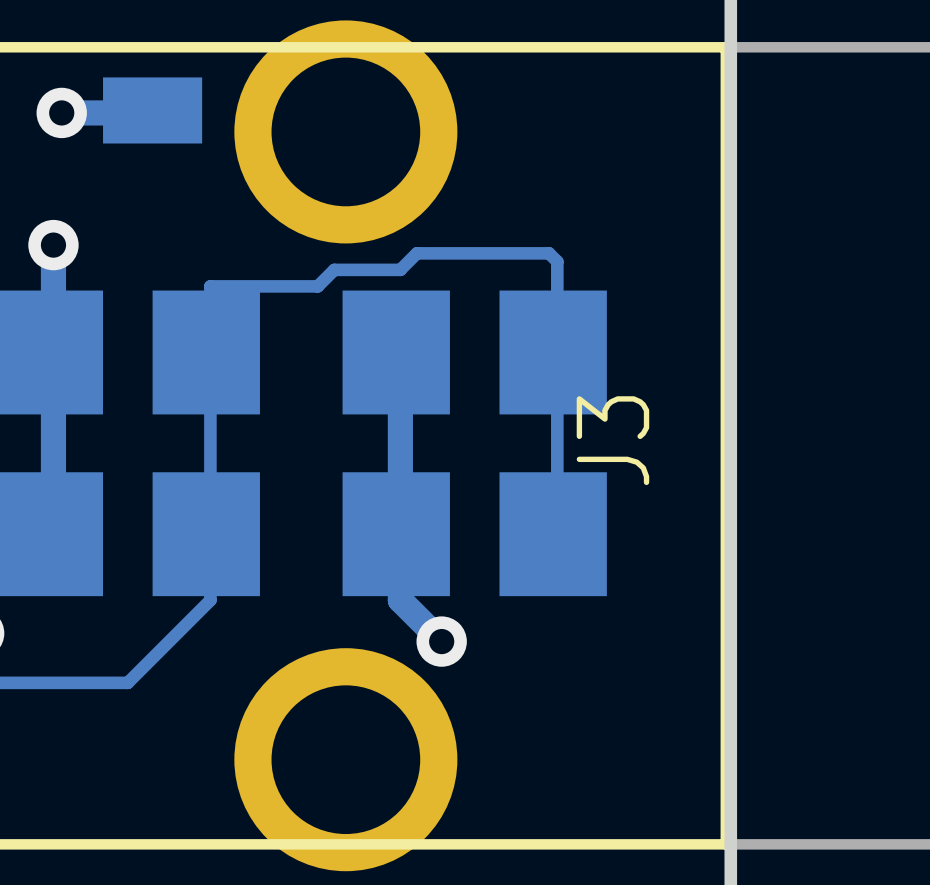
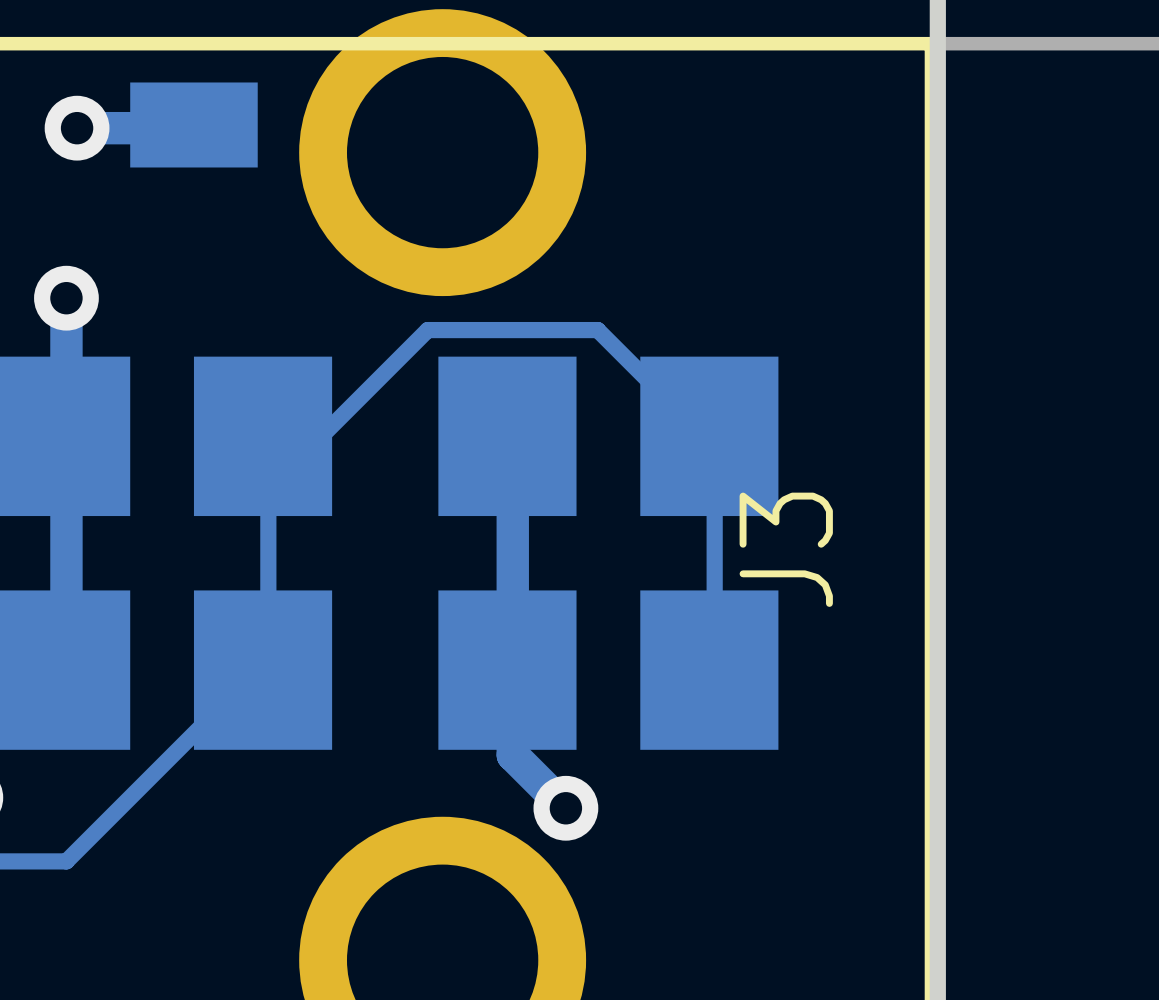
bottom track: (400, 269) (416, 253) (549, 253) (557, 261) (557, 352) -> (512, 330) (597, 330) (704, 436) (709, 436)
bottom track: (317, 286) (210, 286) (210, 352) -> (406, 351) (321, 436) (268, 436)
bottom track: (210, 534) (210, 600) (127, 682) (53, 682) -> (263, 670) (257, 670) (66, 861)

